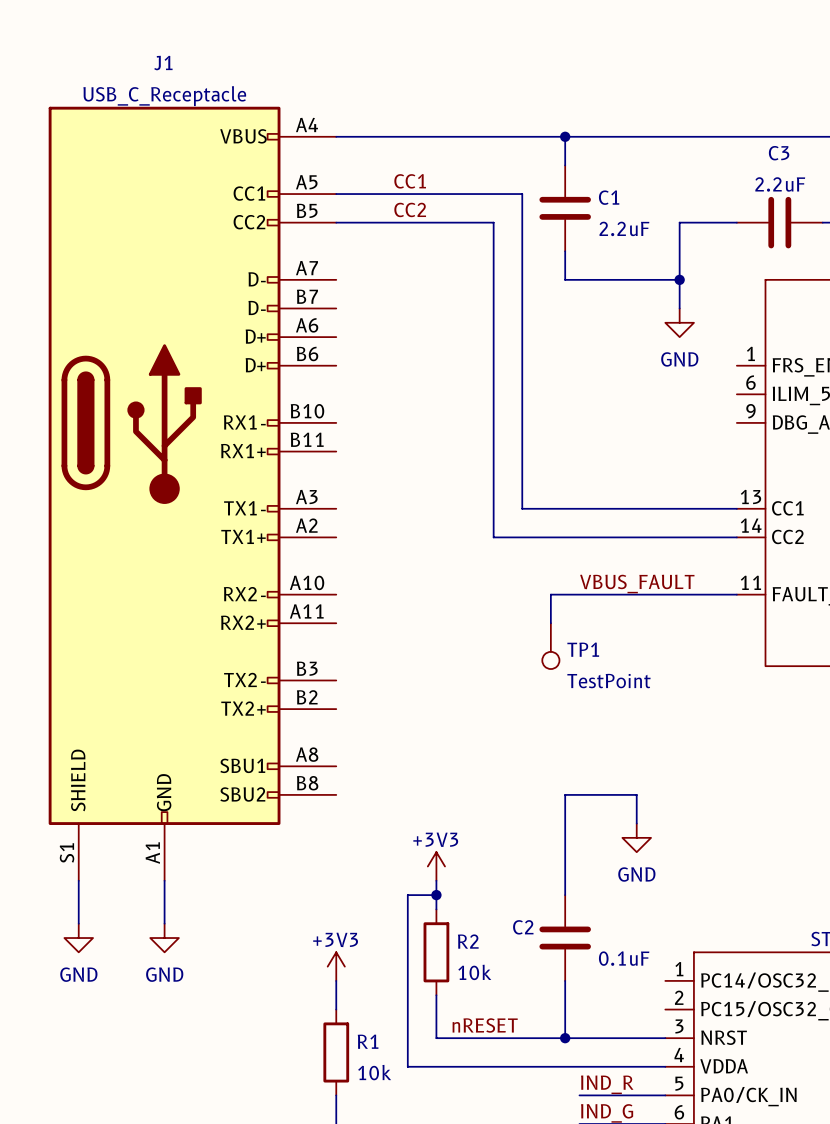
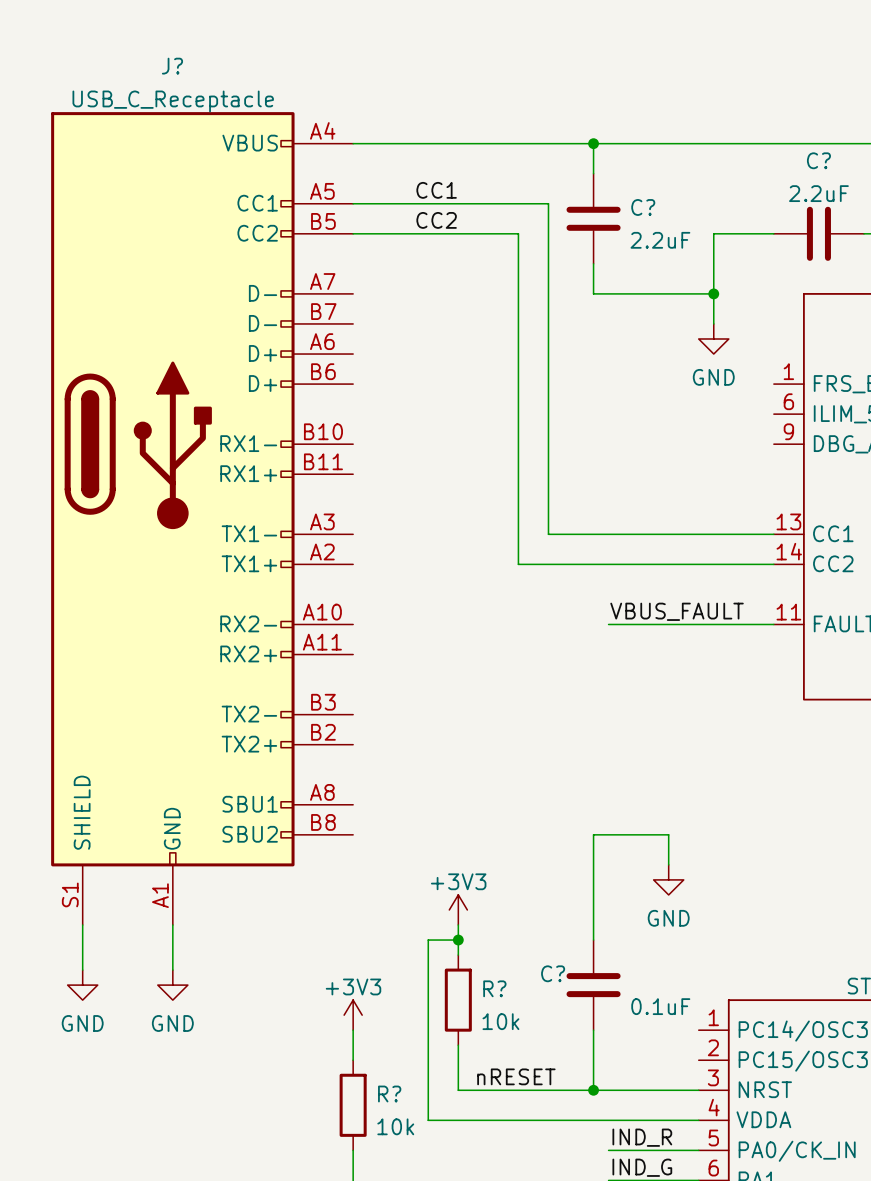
J1 name: J1 (163, 63) -> J? (172, 66)
C3 name: C3 (779, 153) -> C? (818, 160)
C1 name: C1 (609, 197) -> C? (643, 207)
wire: (579, 594) (550, 594) (550, 623) -> none
TP1: TestPoint (550, 646) -> none
C2 name: C2 (523, 927) -> C? (553, 973)
R2 name: R2 (468, 941) -> R? (494, 988)
R1 name: R1 (368, 1041) -> R? (389, 1094)

